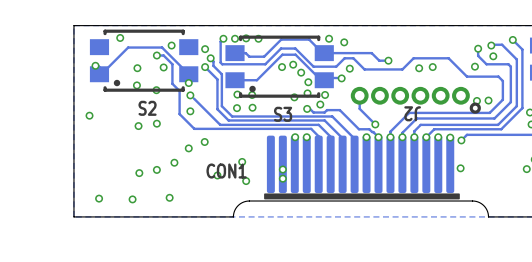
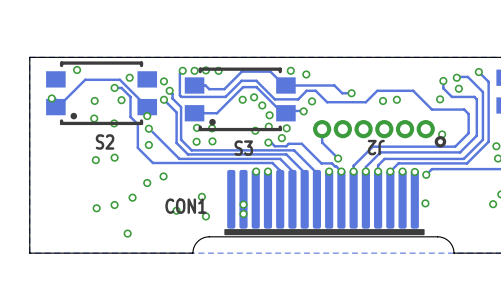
via: (488, 100) -> none
via: (89, 115) -> none
via: (99, 198) -> none
via: (132, 199) -> none

